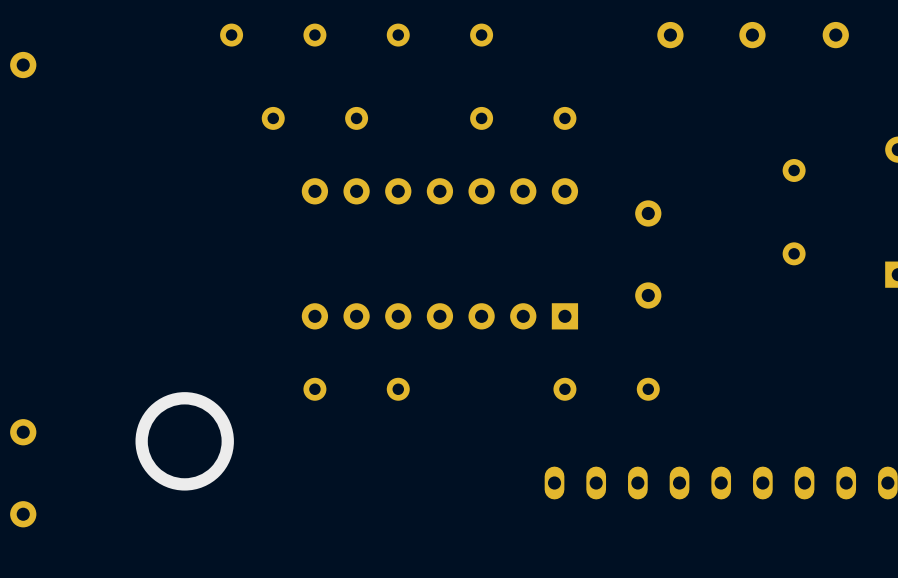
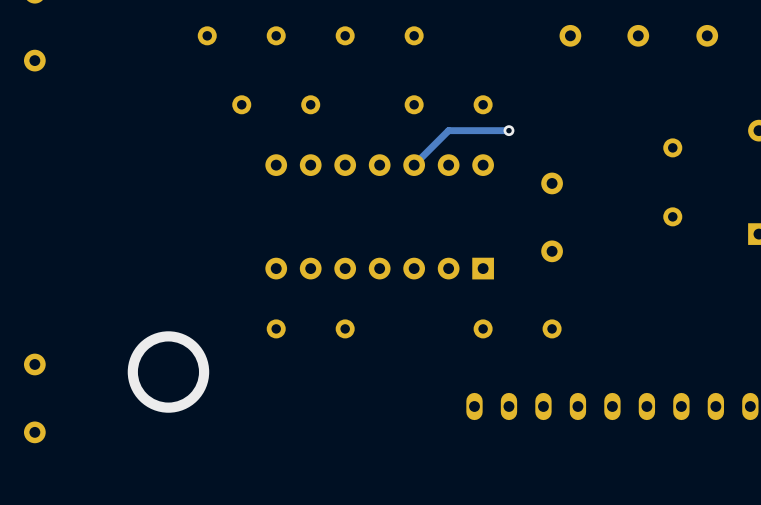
track: none -> (508, 130) (448, 130) (414, 165)
via: none -> (508, 130)

